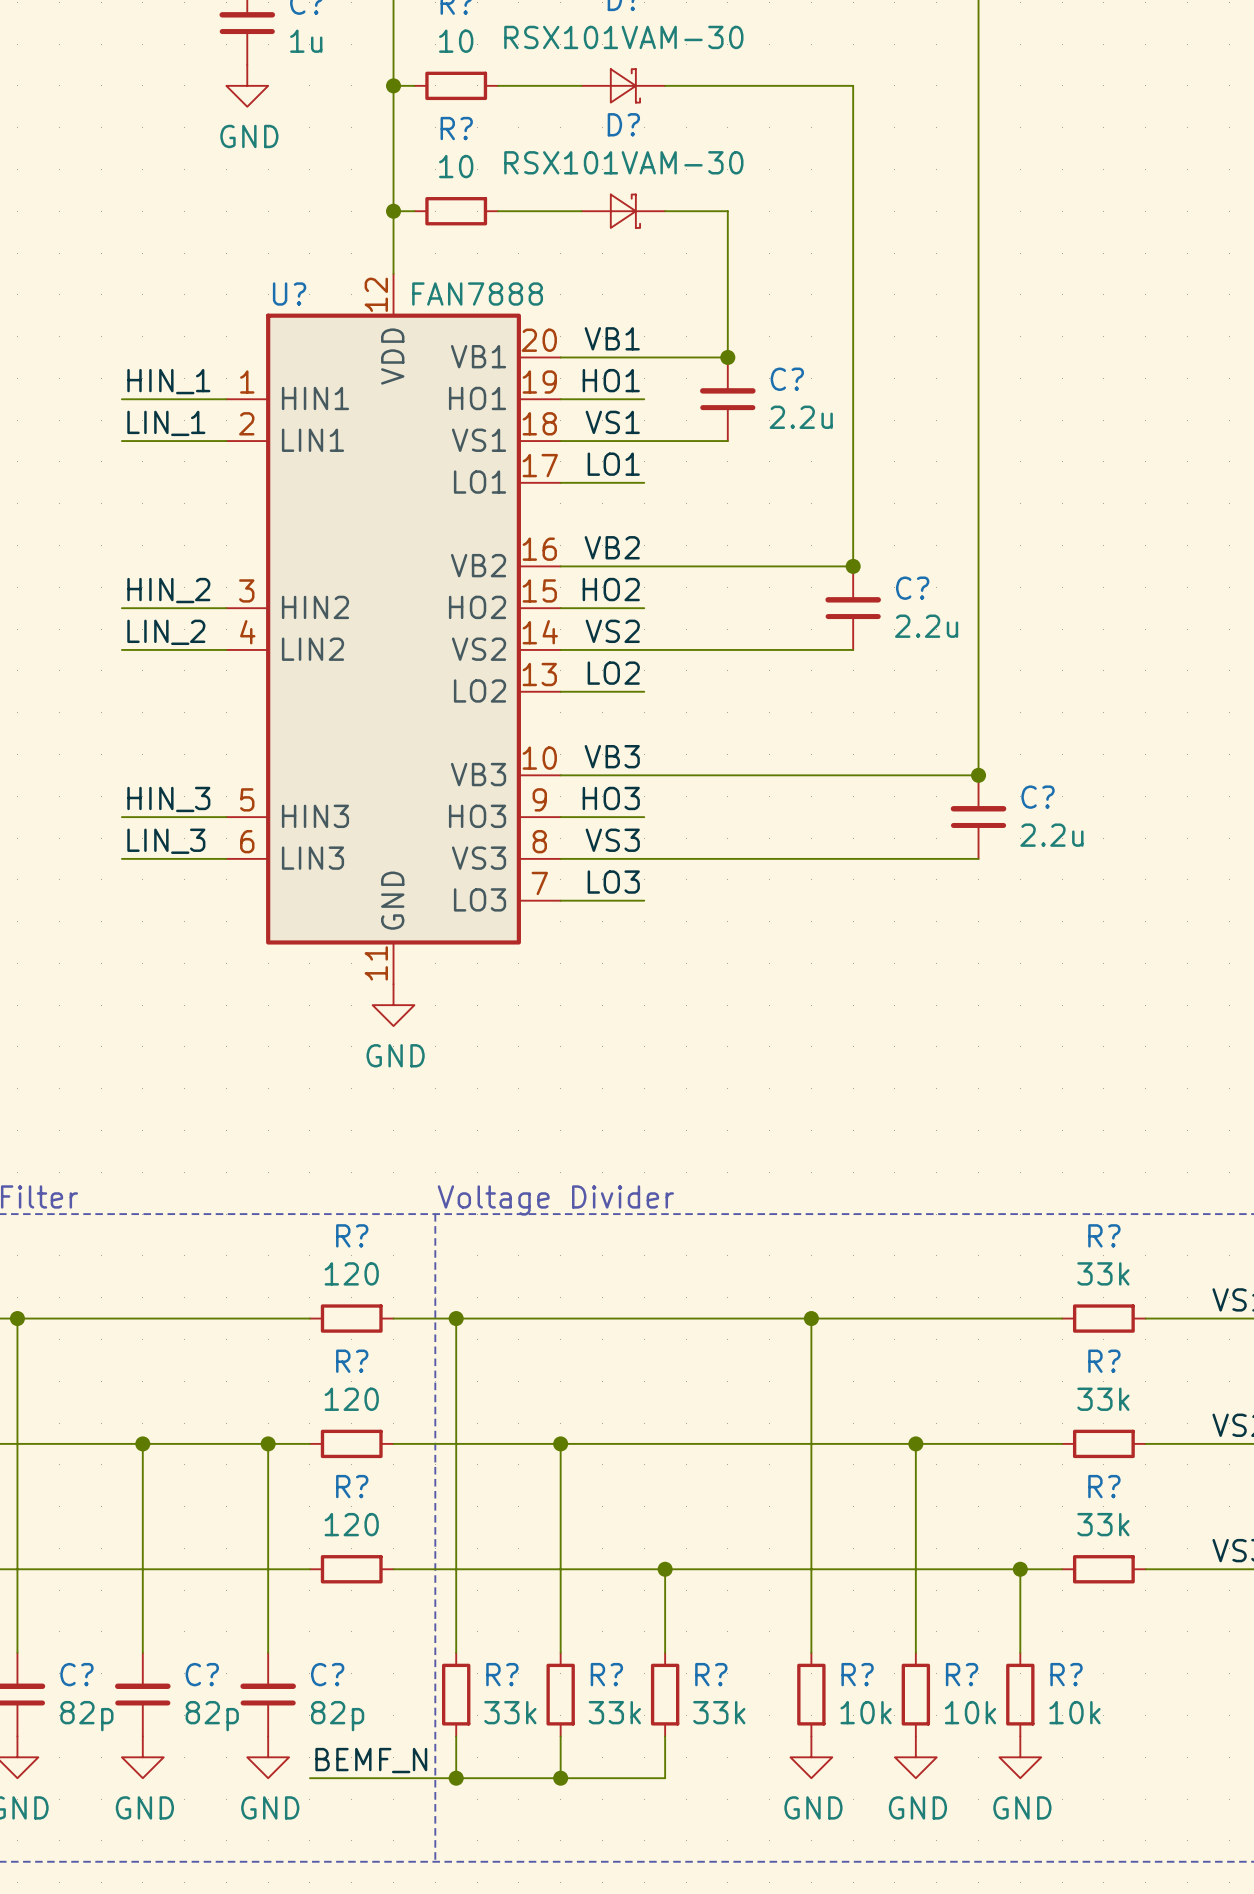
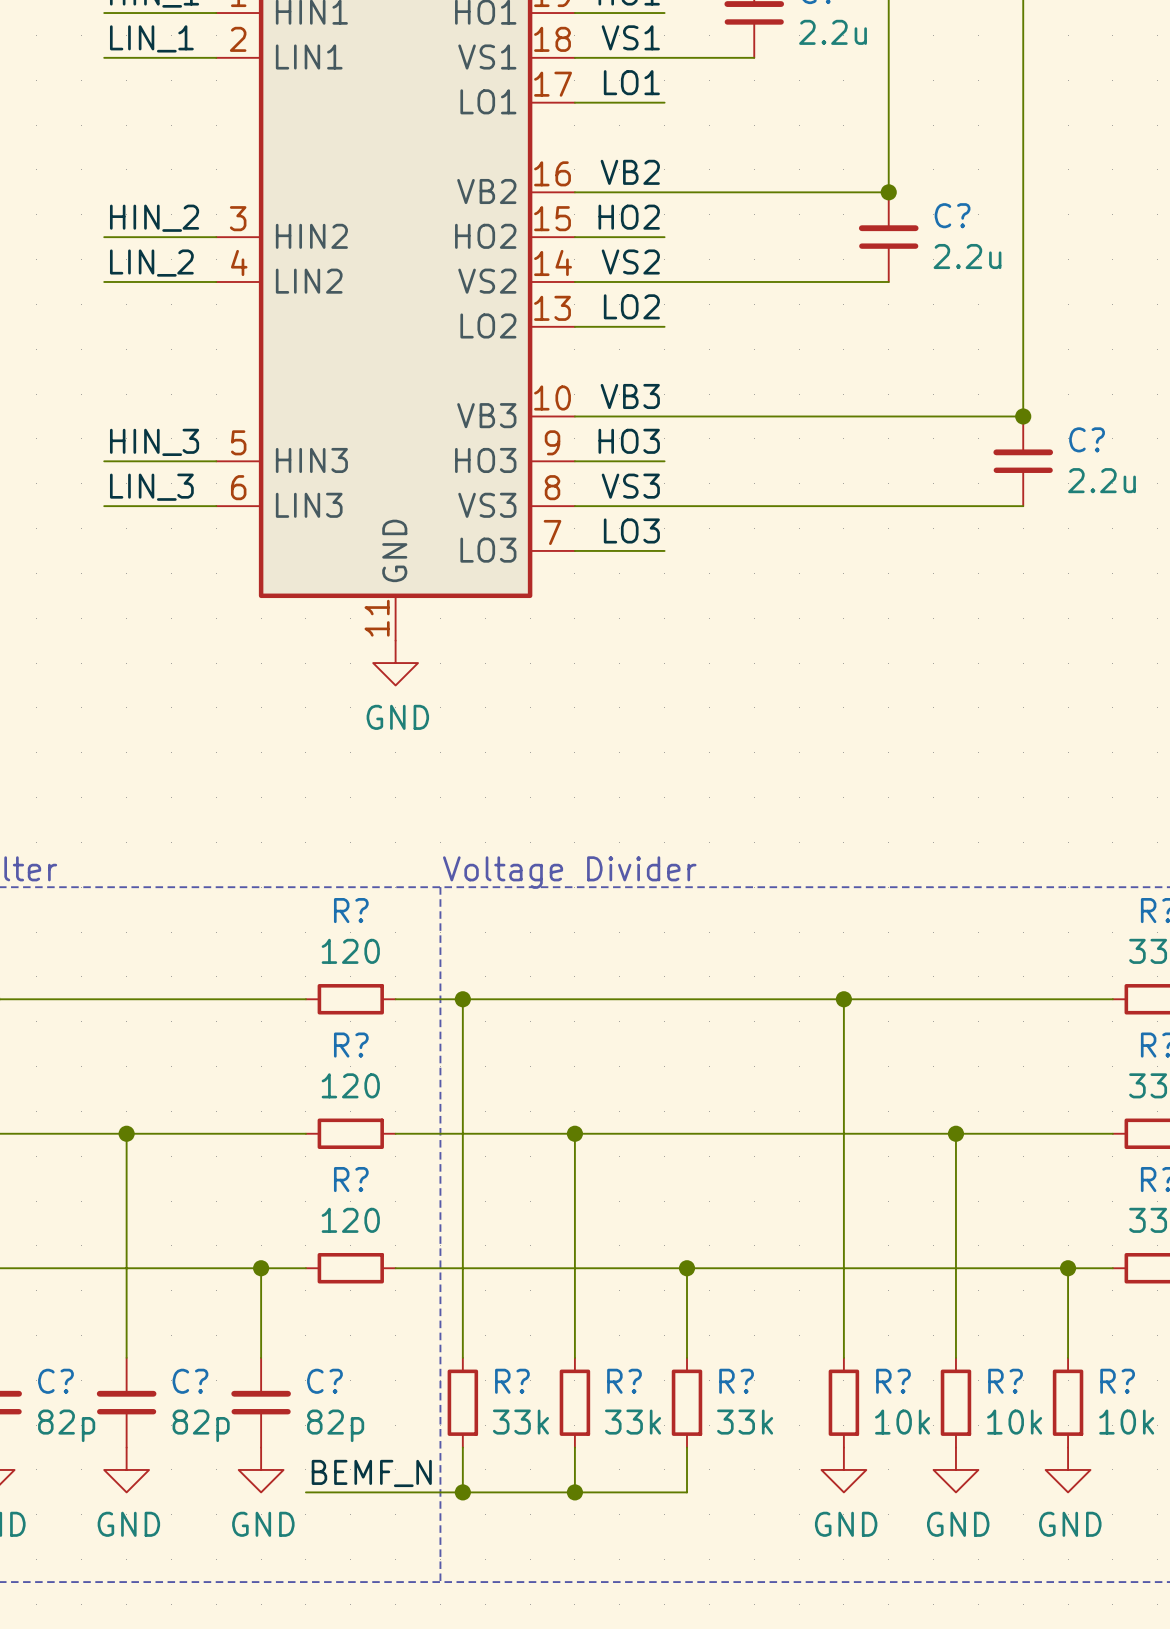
wire: (268, 1443) (268, 1569) -> none
junction: (268, 1443) -> none
junction: none -> (261, 1268)

